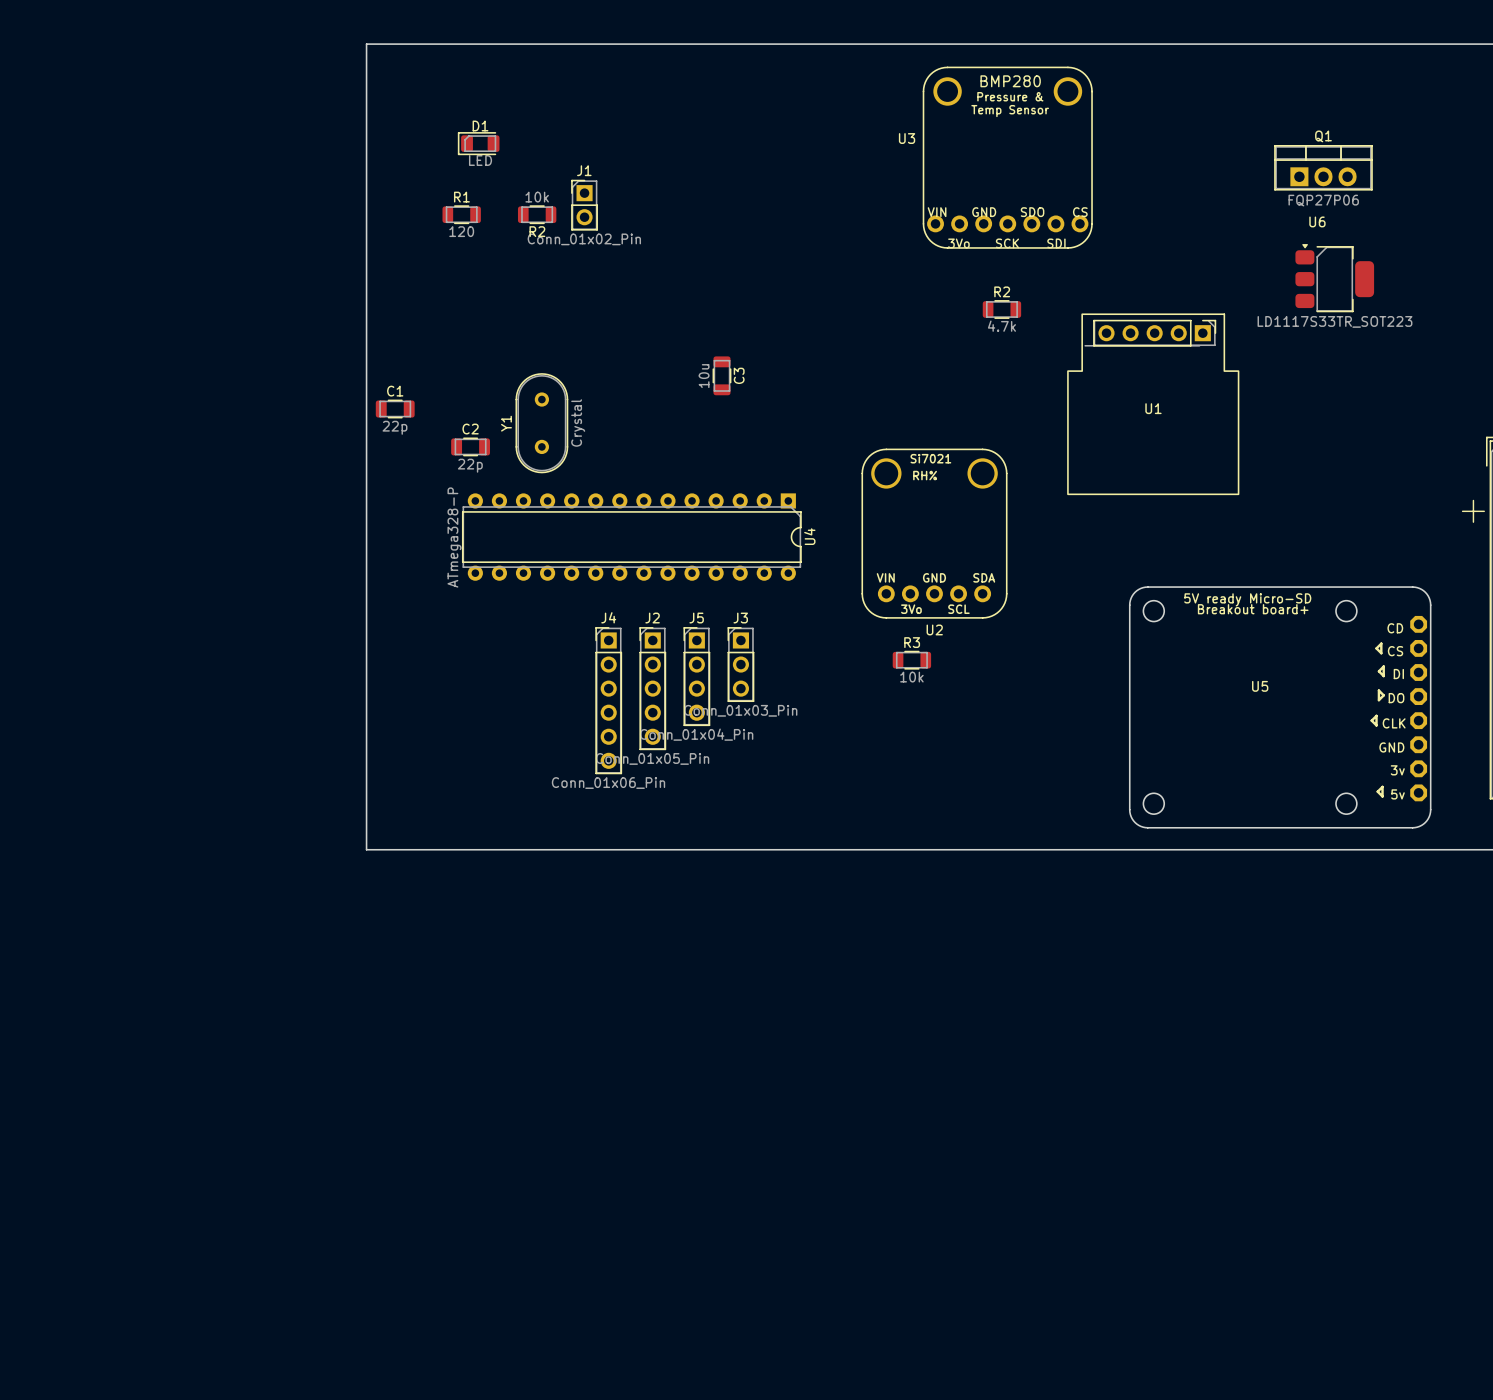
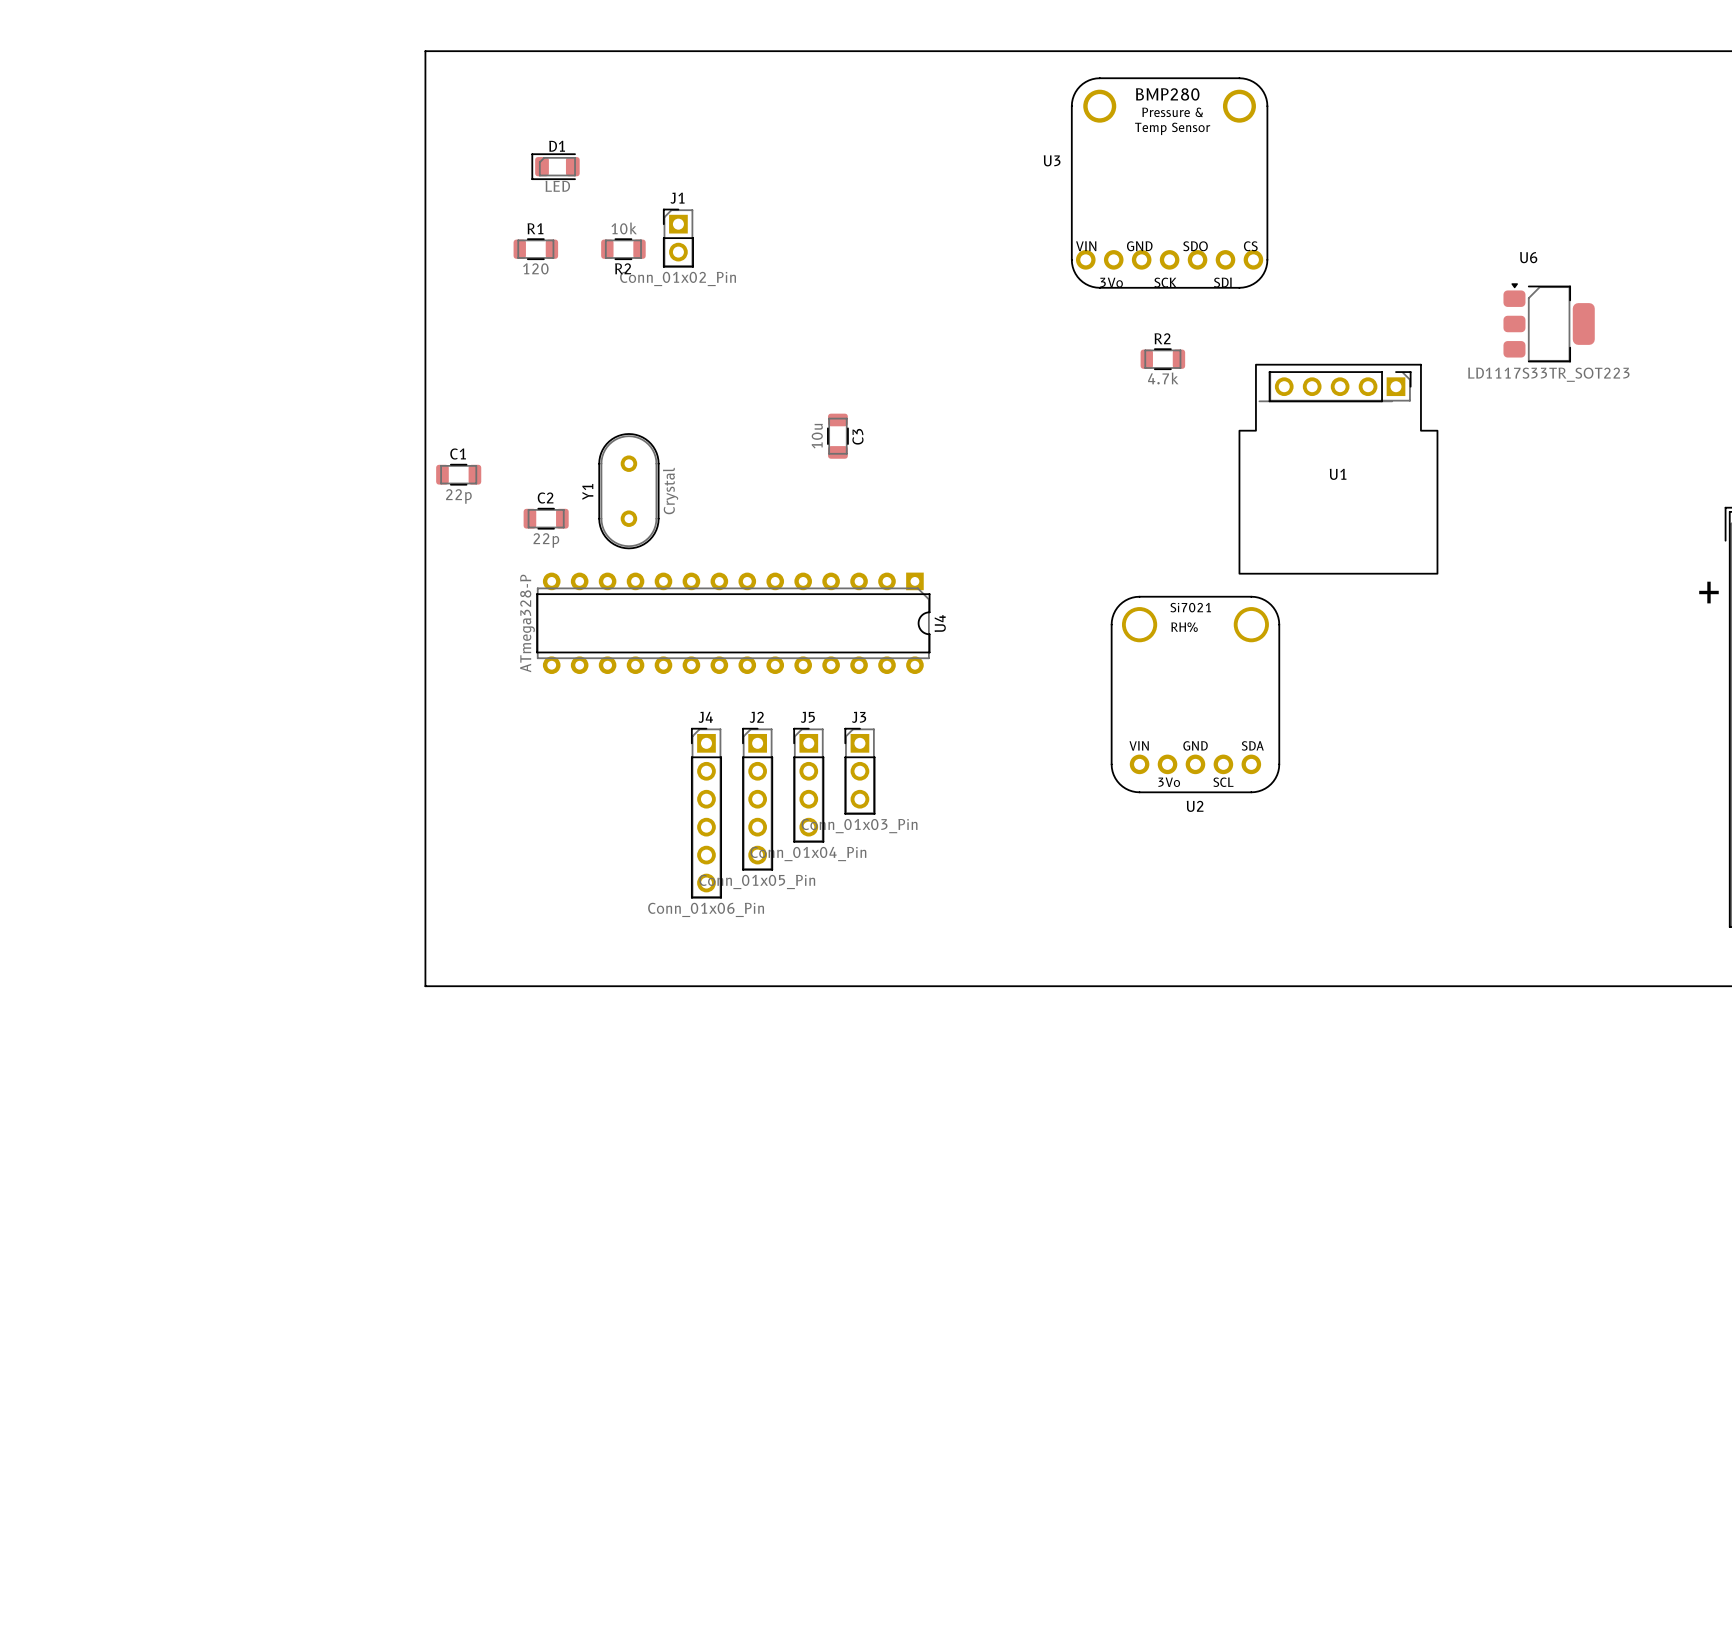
Q1: FQP27P06 (1323, 167) -> none
U2 position: (934, 533) -> (1195, 694)
R3: 10k (911, 660) -> none
U5: (1280, 707) -> none

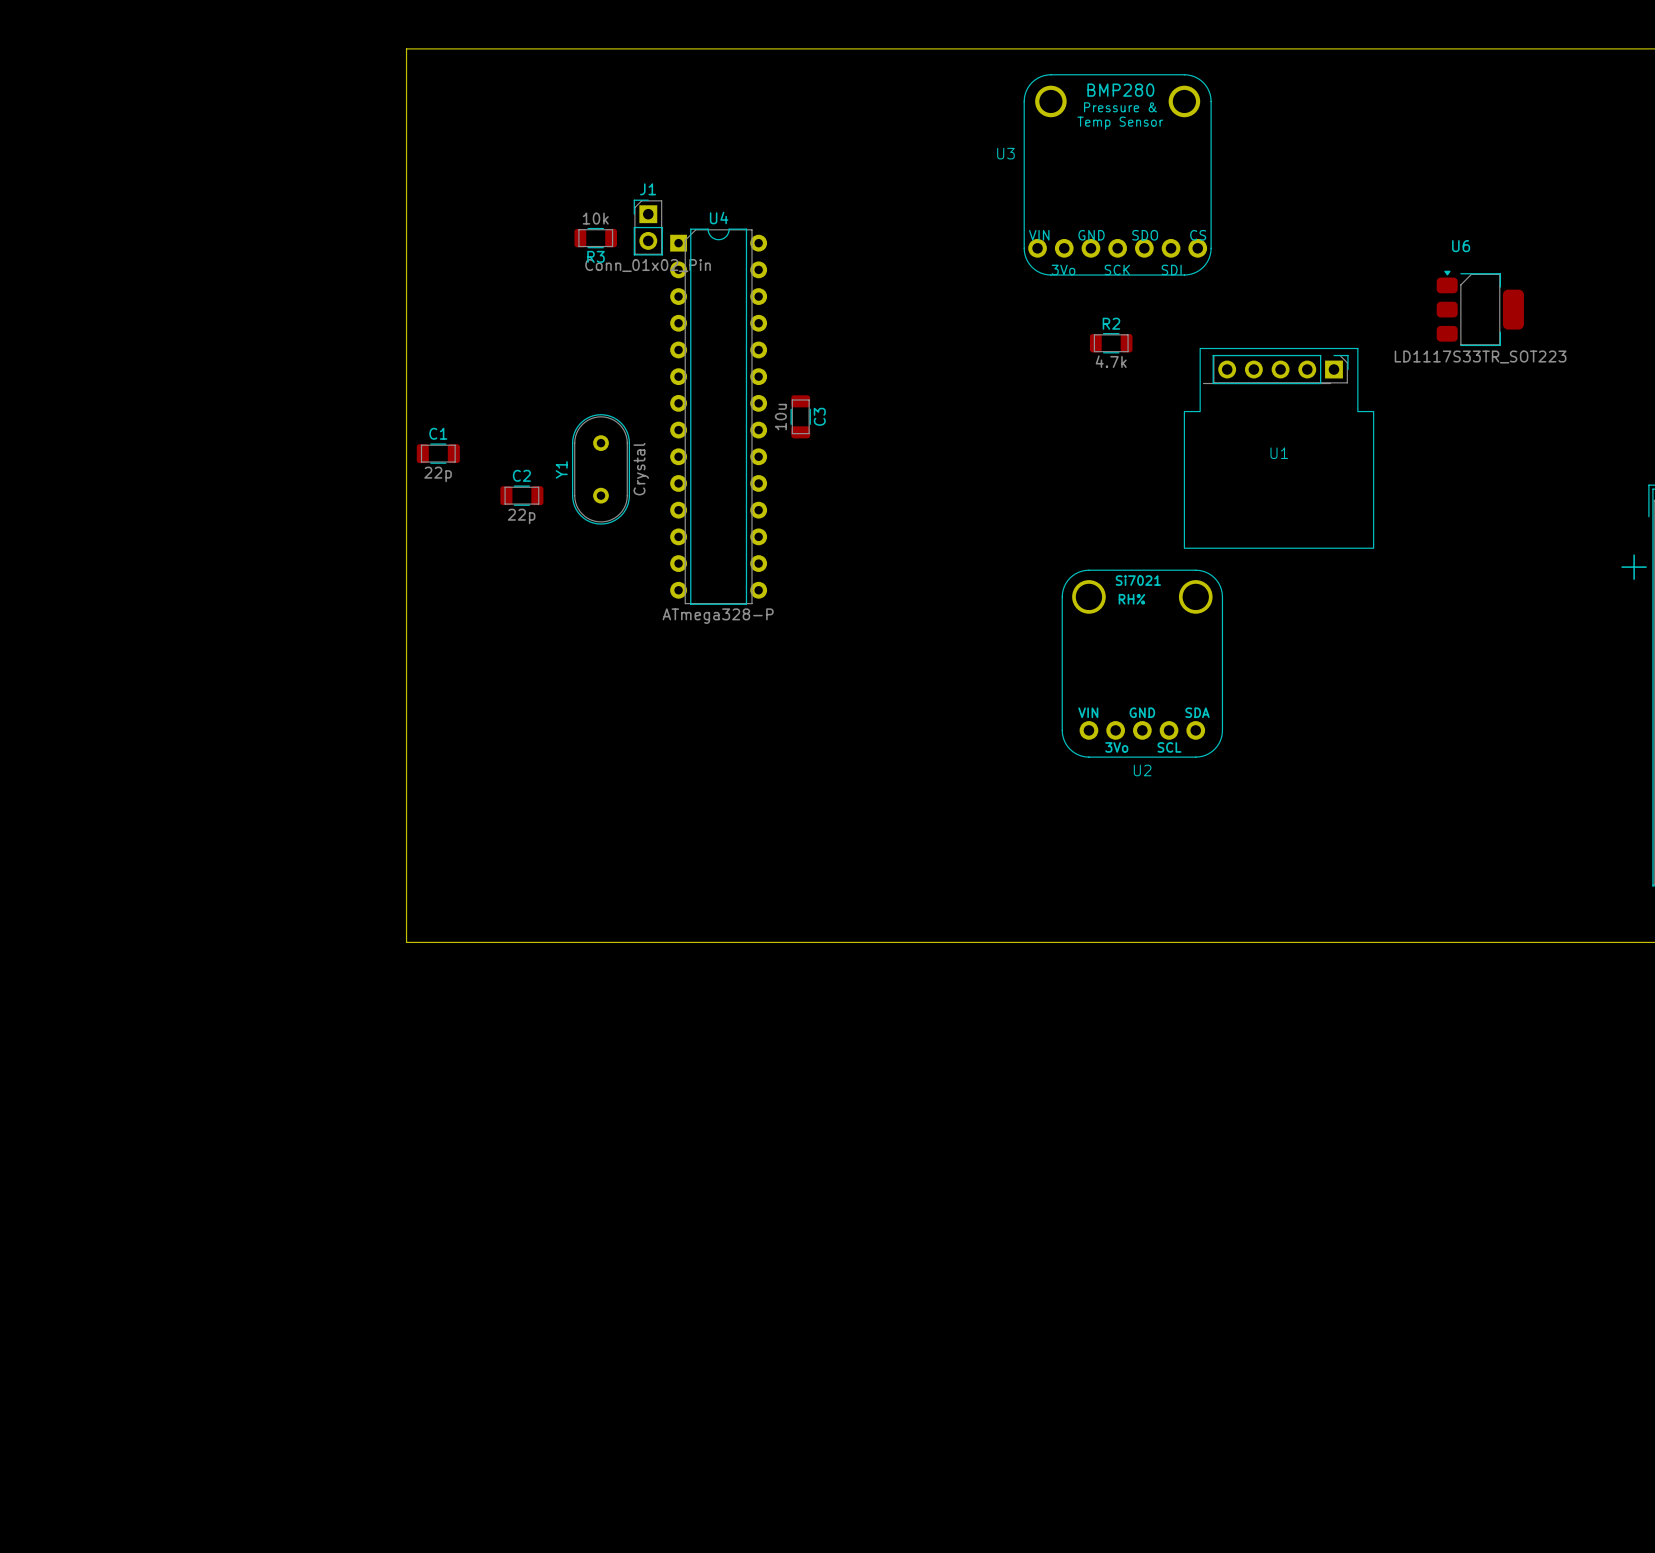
D1: LED (555, 166) -> none
R1: 120 (535, 249) -> none
R2 name: R2 (623, 268) -> R3 (595, 256)
U4 rotation: 0° (733, 623) -> 90° counterclockwise (718, 416)
J3: Conn_01x03_Pin (859, 771) -> none
J5: Conn_01x04_Pin (808, 785) -> none
J2: Conn_01x05_Pin (757, 799) -> none
J4: Conn_01x06_Pin (706, 813) -> none

